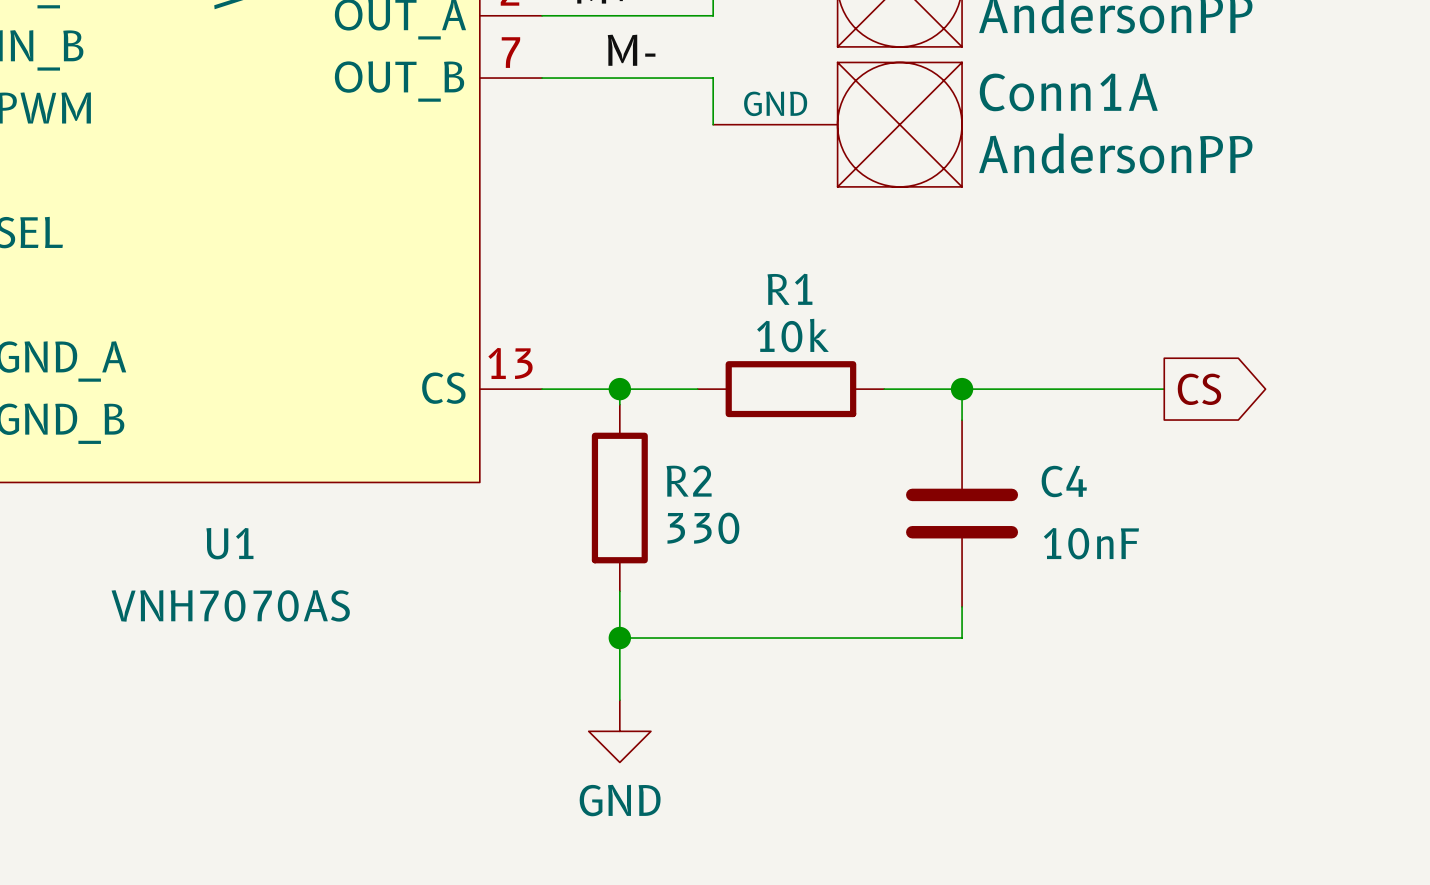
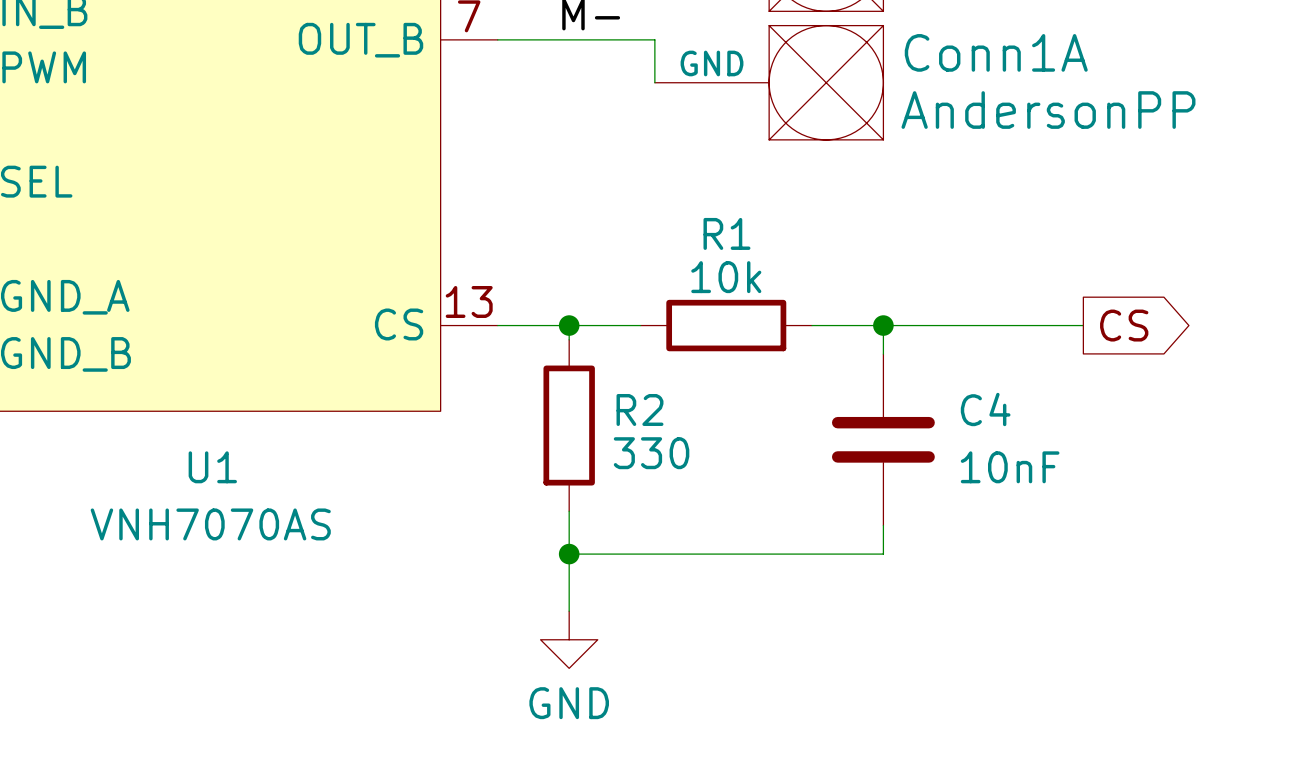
wire: none -> (1069, 325) (1083, 325)
global label position: CS (1199, 389) -> CS (1124, 325)

